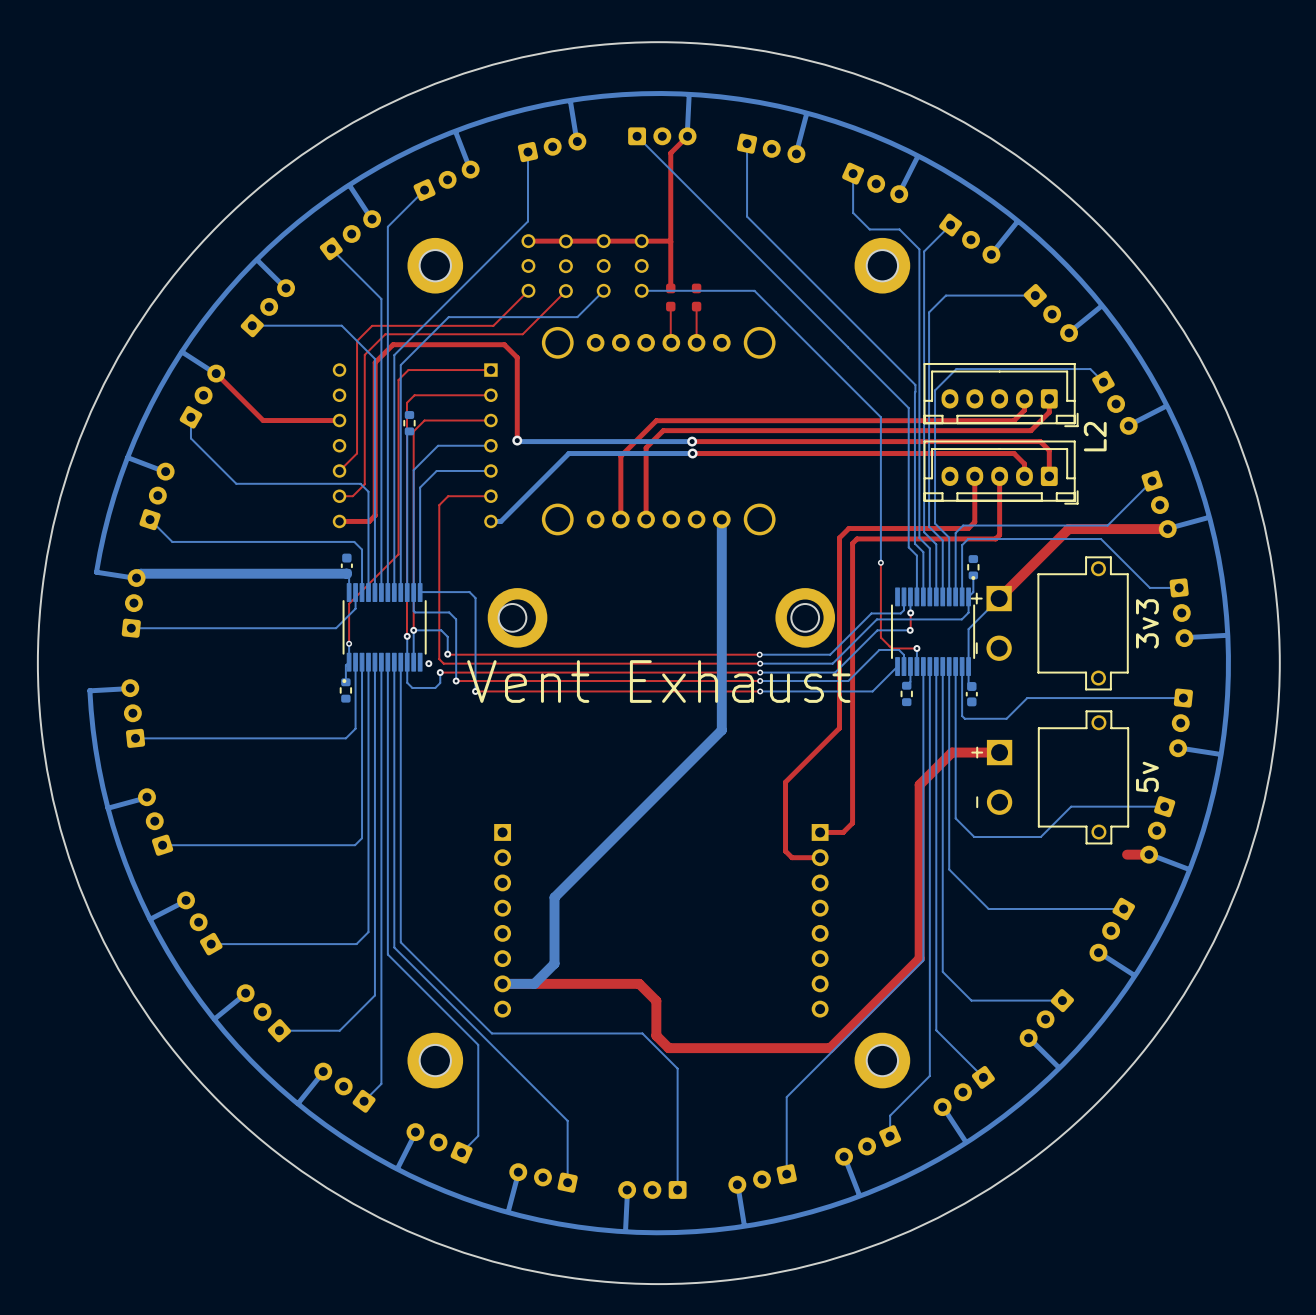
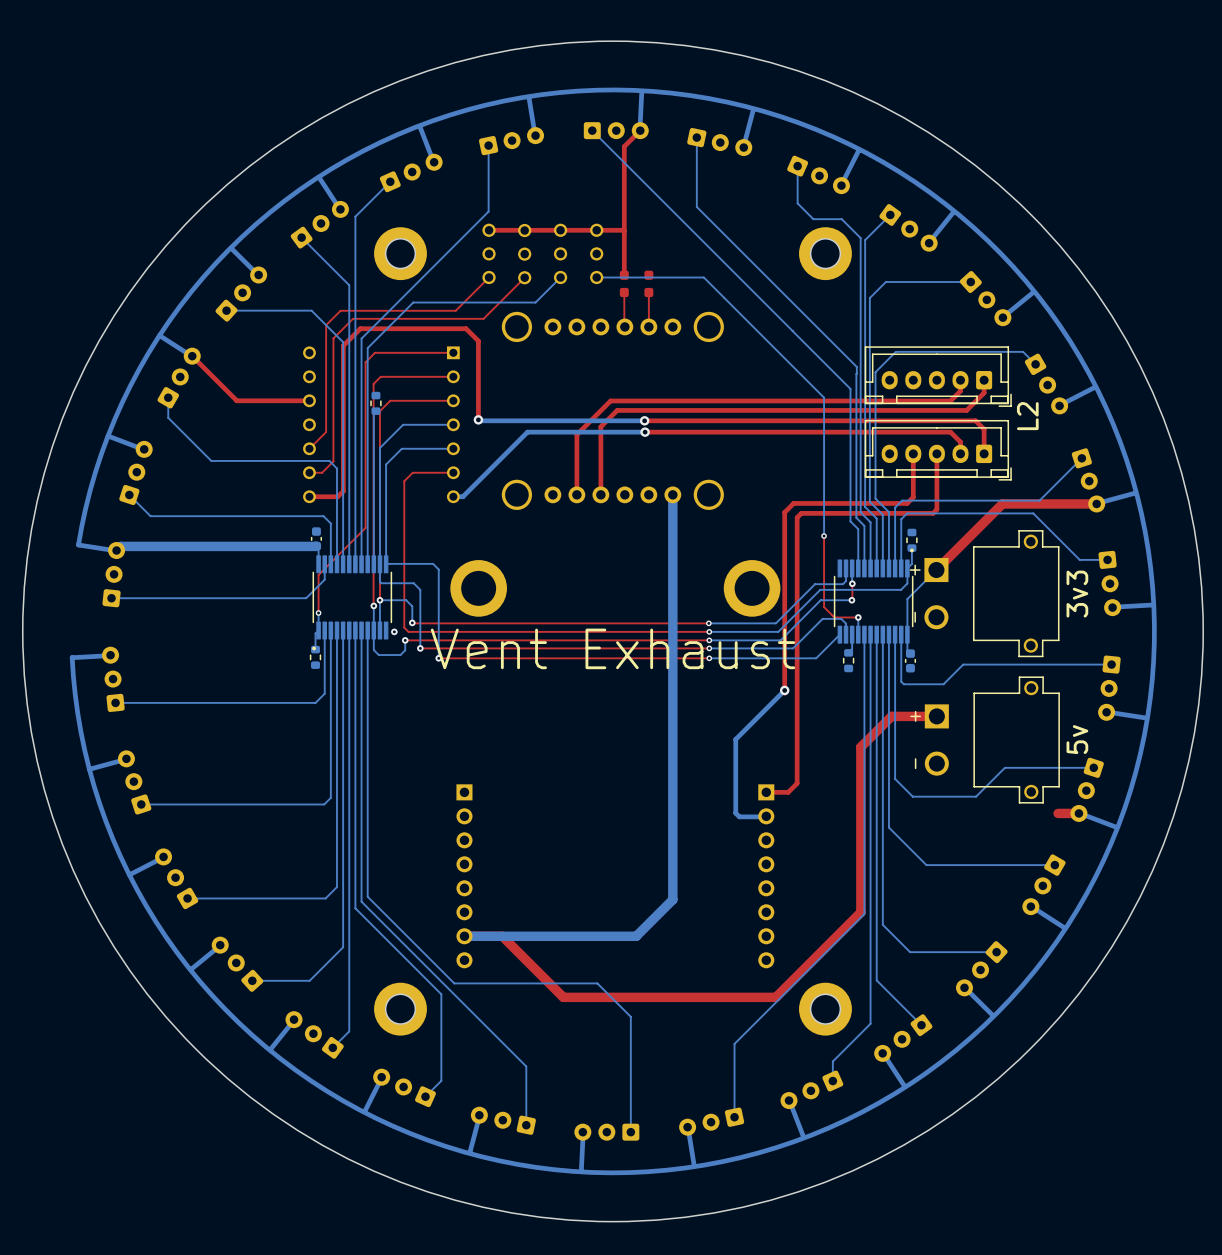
round board edge: [498, 603, 527, 633] -> none
round board edge: [791, 603, 820, 633] -> none
via: none -> (784, 690)
bottom track: none -> (785, 692) (784, 690) (735, 739) (735, 813) (739, 816) (763, 816)
top track: (839, 728) (785, 782) (785, 851) (792, 857) (820, 857) -> none
bottom track: (721, 730) (554, 897) (554, 963) (534, 983) -> (672, 695) (672, 899) (636, 936) (494, 936)
top track: (542, 983) (639, 983) (656, 1000) (656, 1035) (668, 1048) -> (502, 936) (563, 997) (622, 997)

